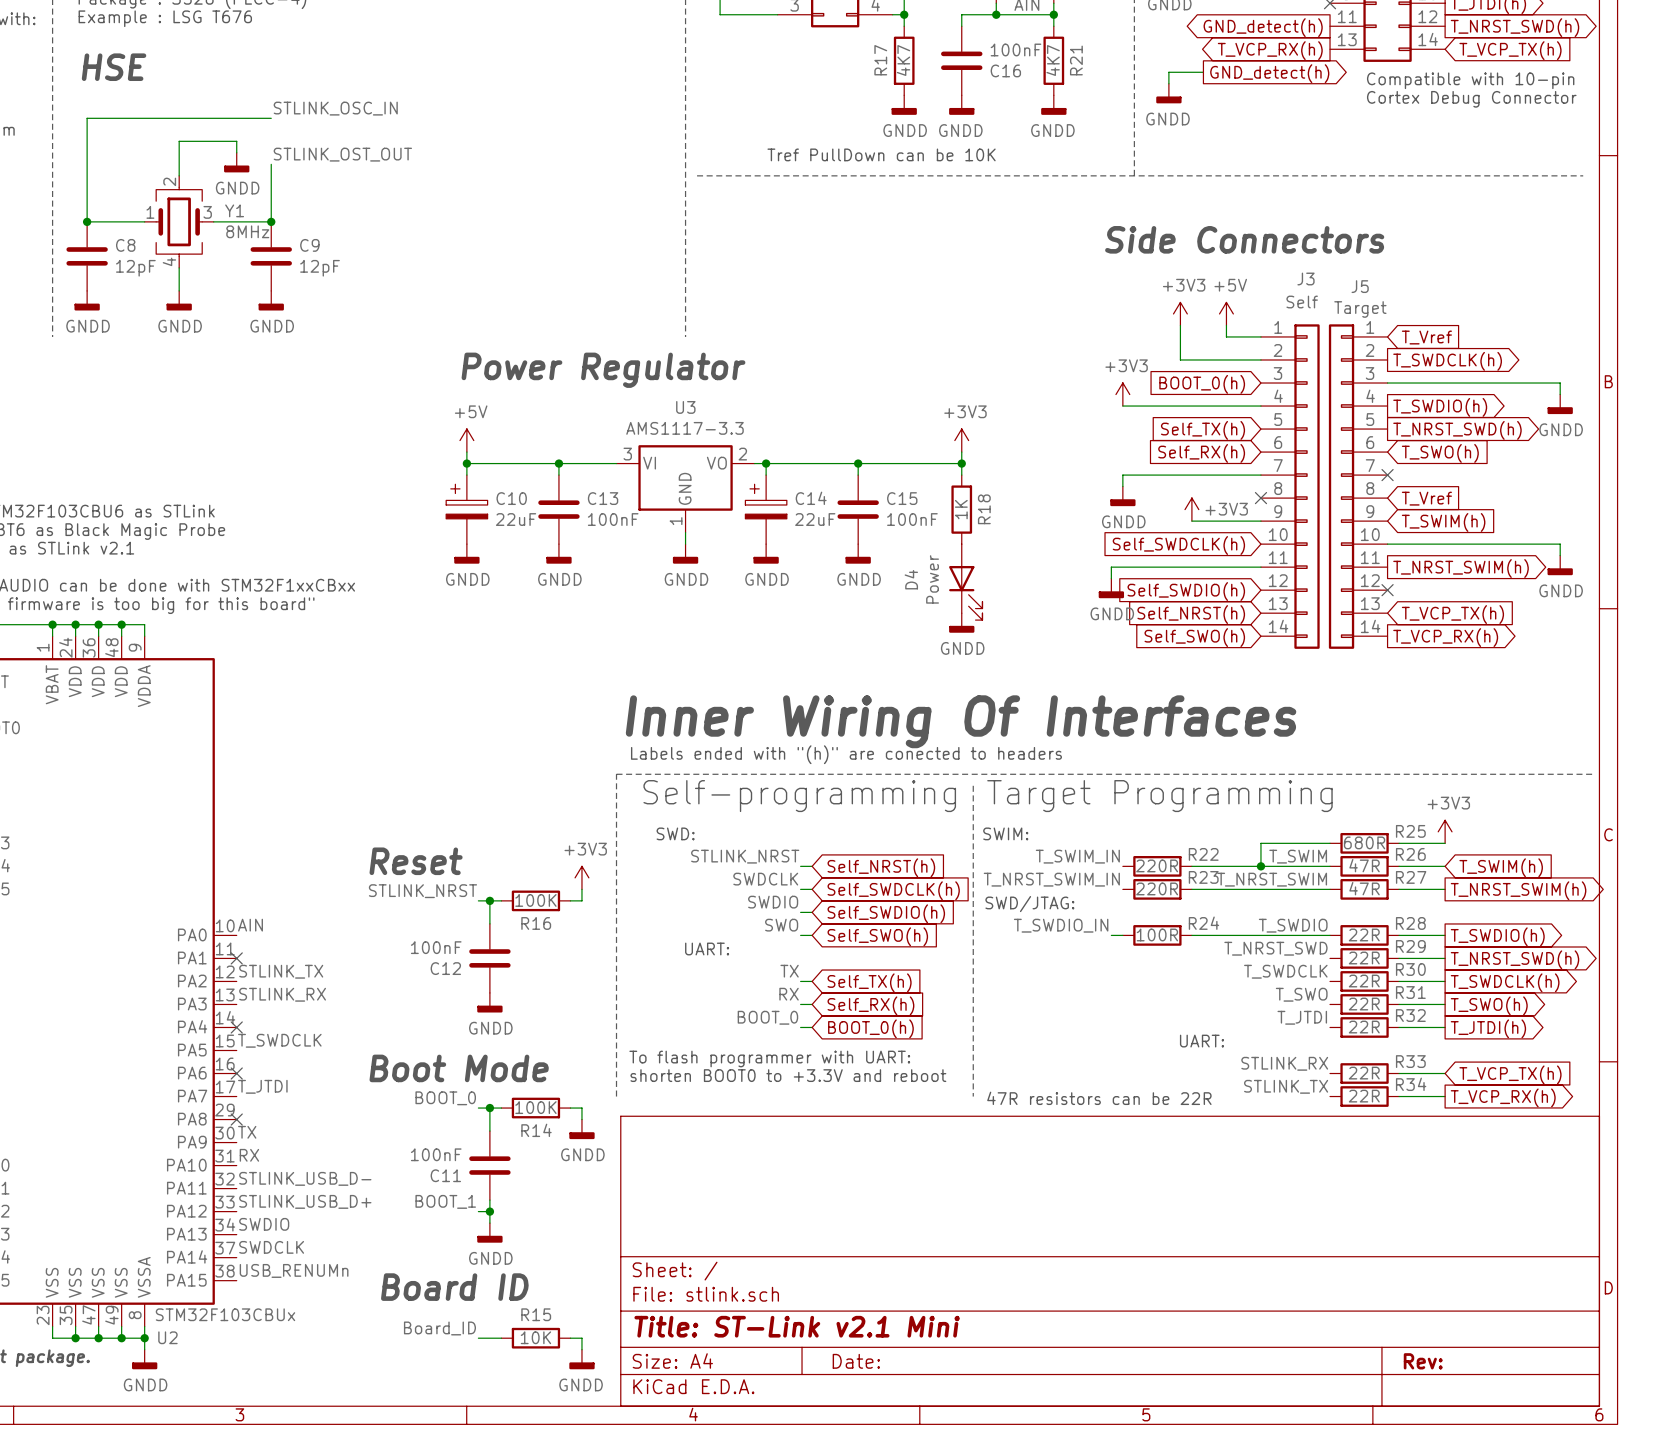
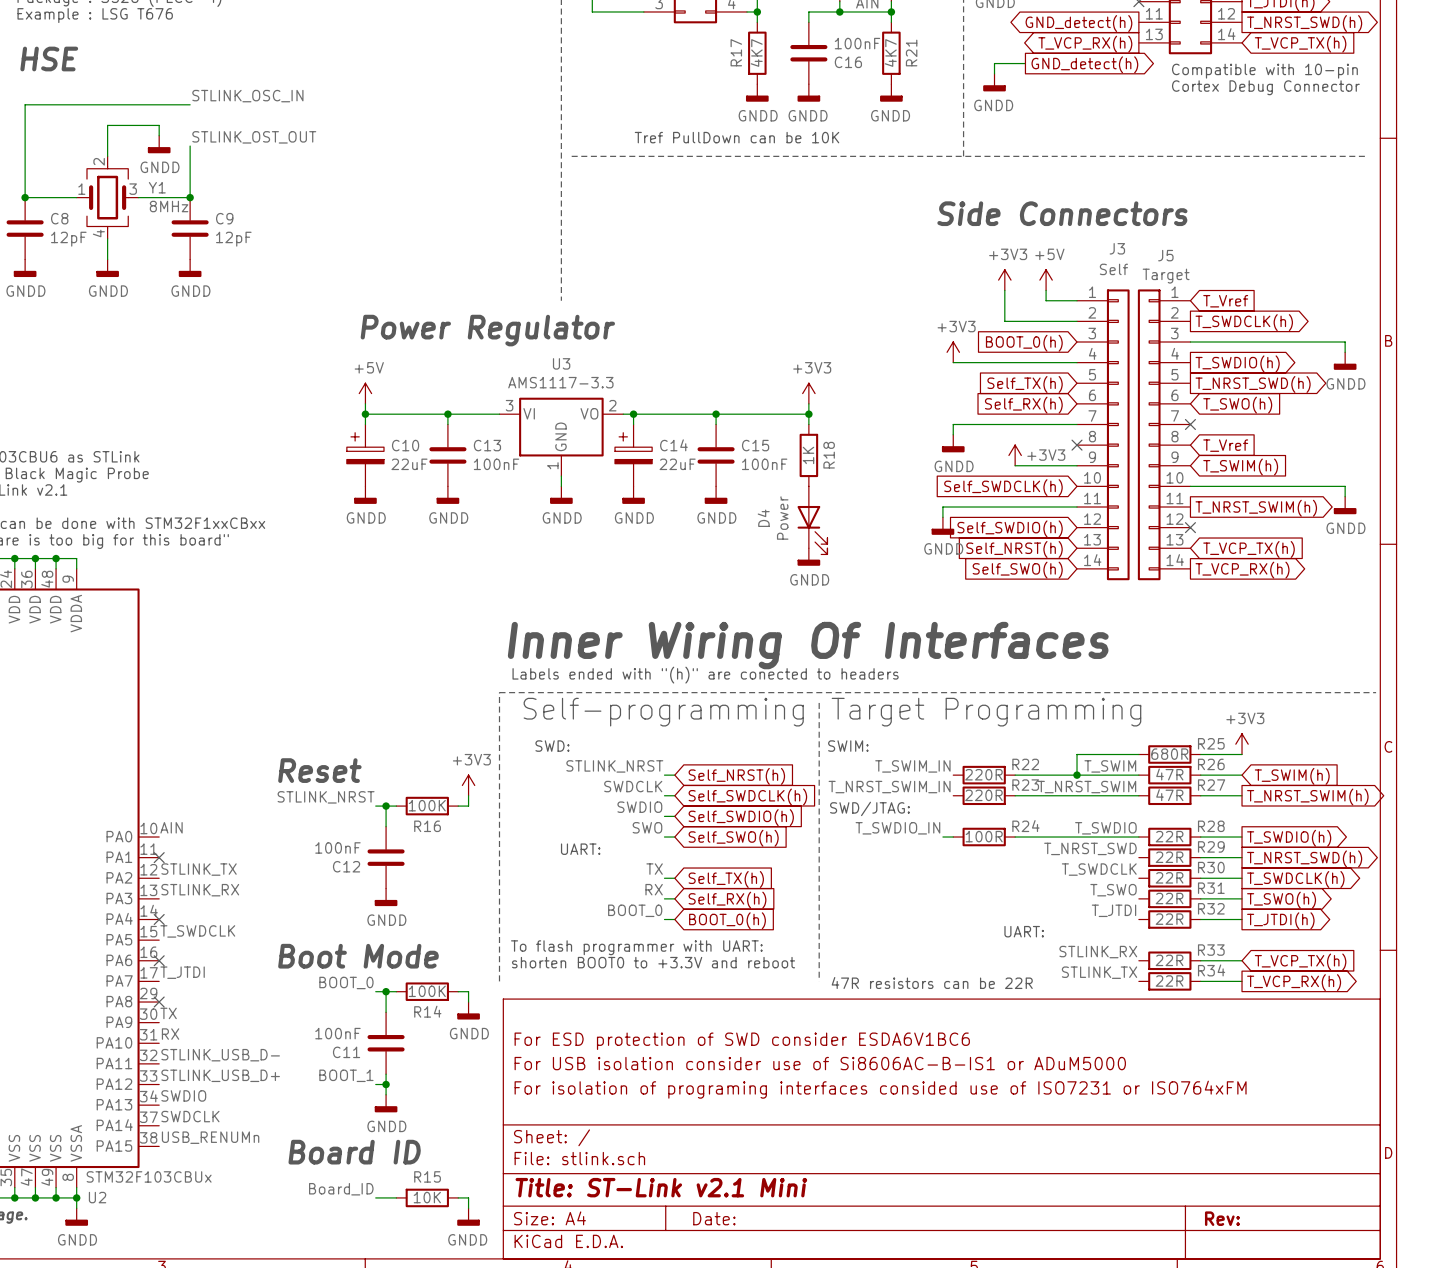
title block: none -> For ESD protection of SWD consider ESDA6V1BC6 (742, 1041)
title block: none -> For USB isolation consider use of Si8606AC-B-IS1 or ADuM5000 (820, 1063)
title block: none -> For isolation of programing interfaces consided use of ISO7231 or ISO764xFM (880, 1089)

